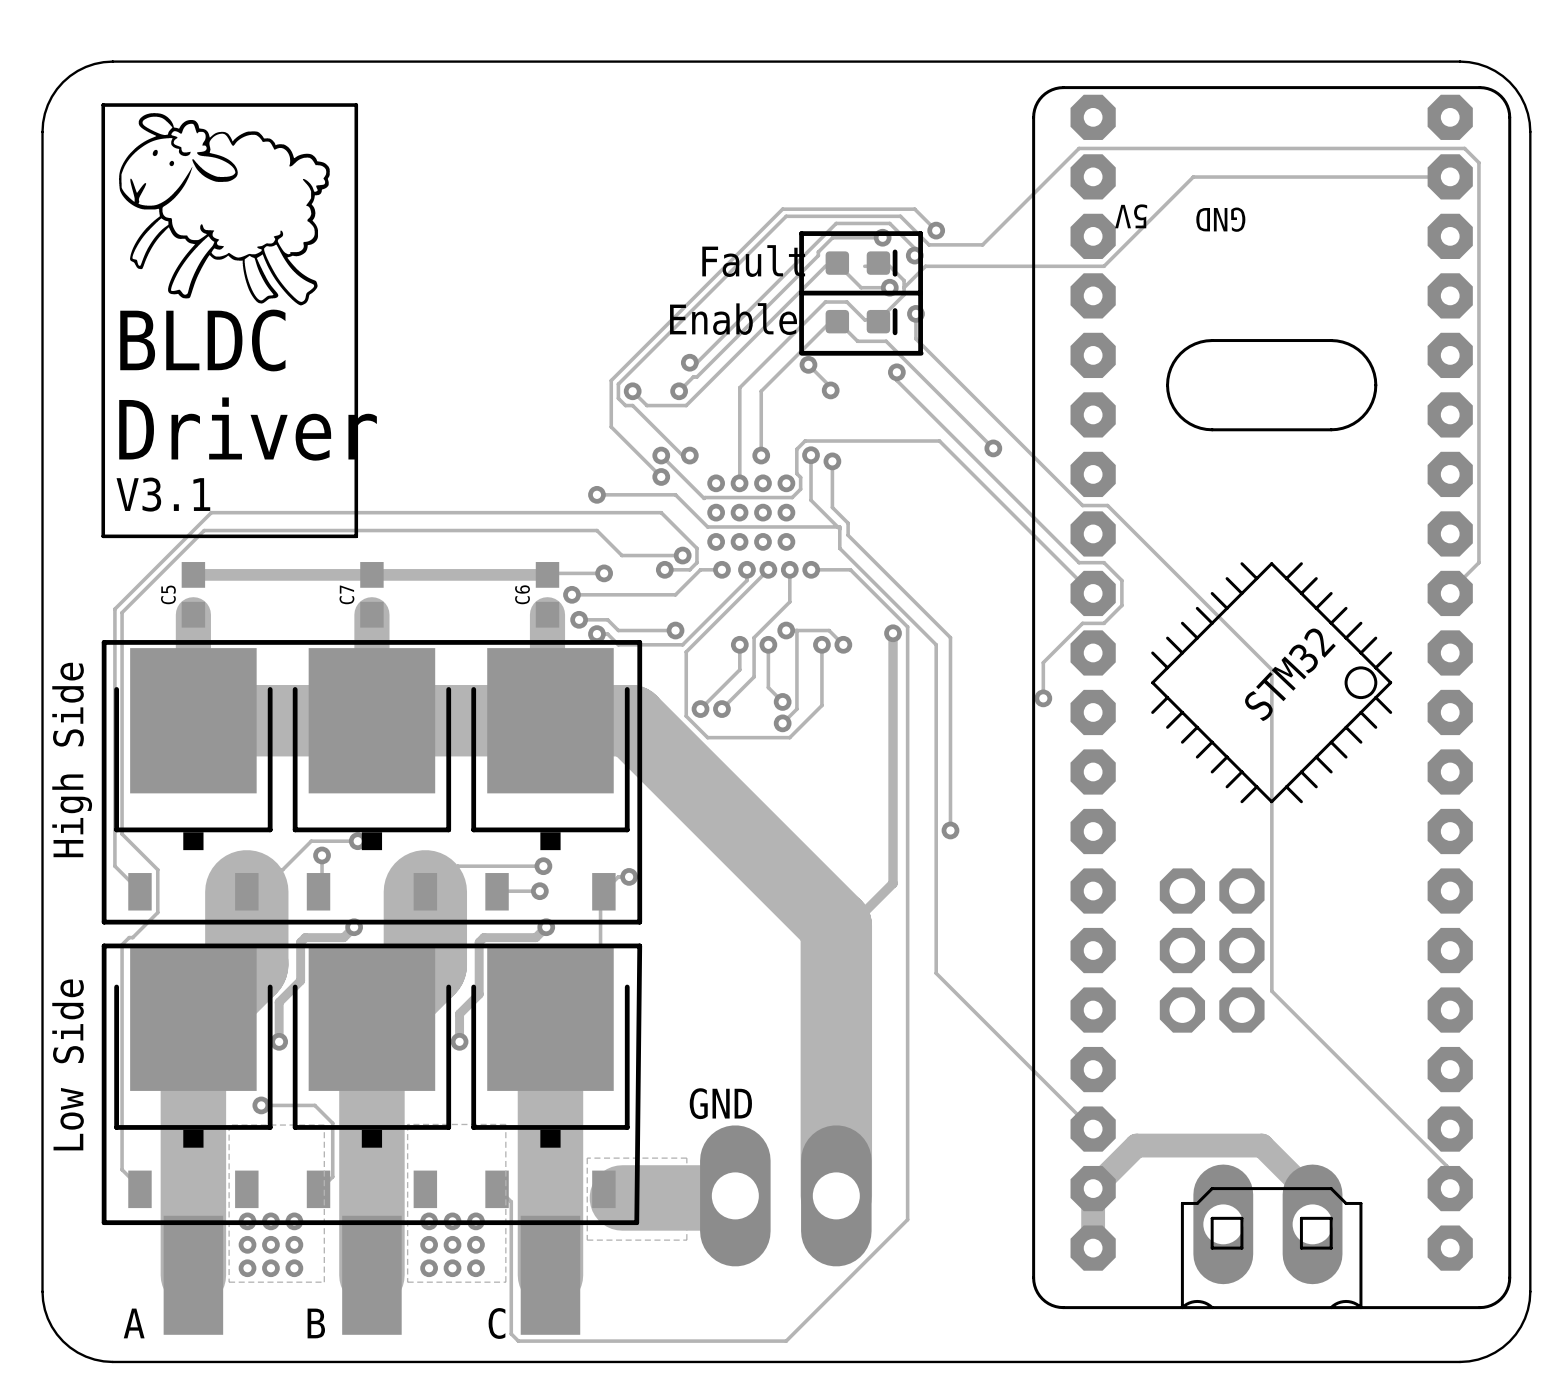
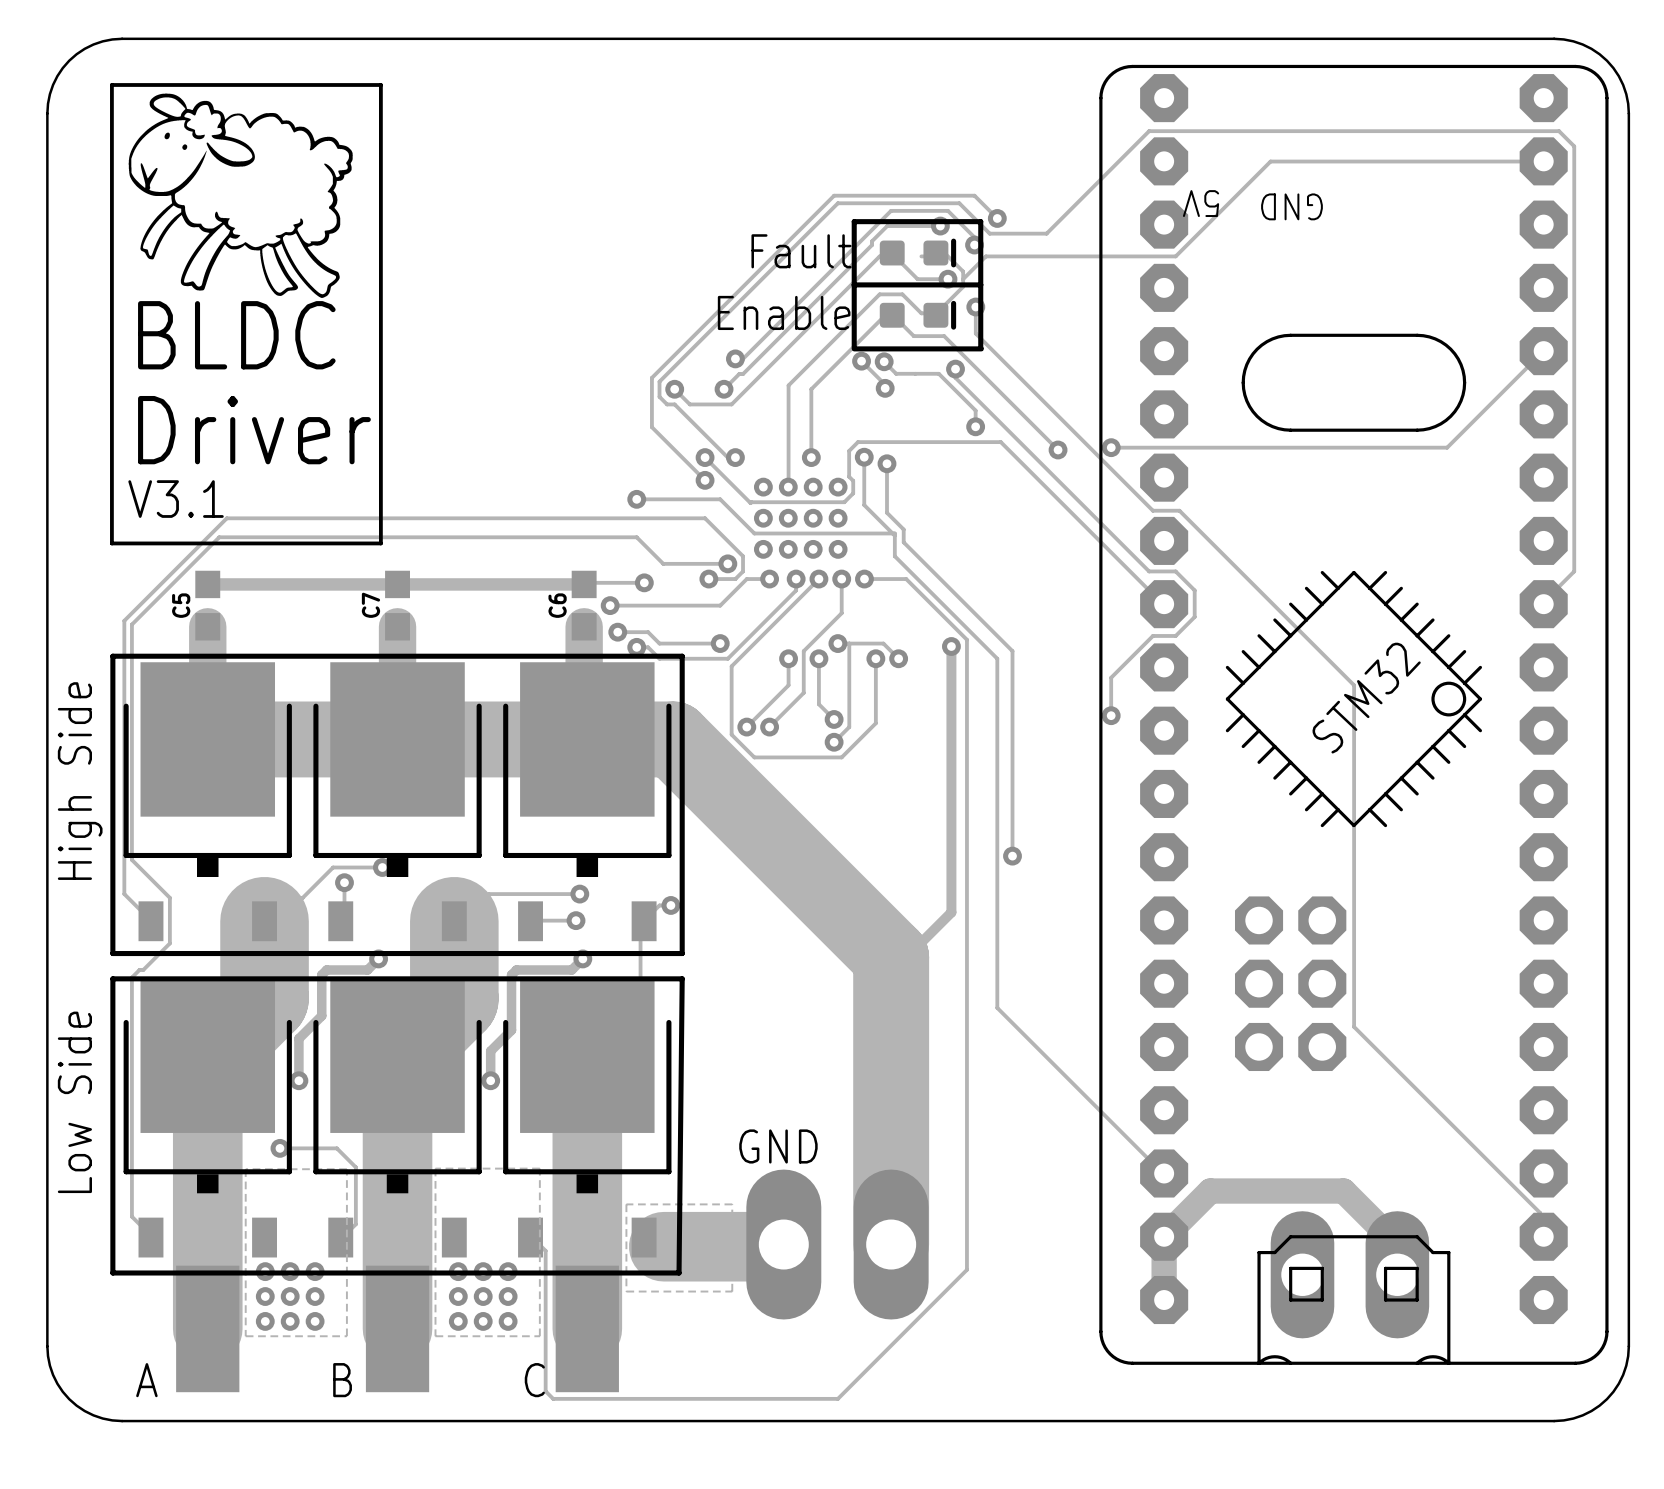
track: none -> (1543, 351) (1447, 447) (1111, 447)
track: none -> (884, 361) (896, 373) (938, 373) (975, 410) (975, 426)
via: none -> (884, 361)
via: none -> (975, 426)
via: none -> (1111, 447)

